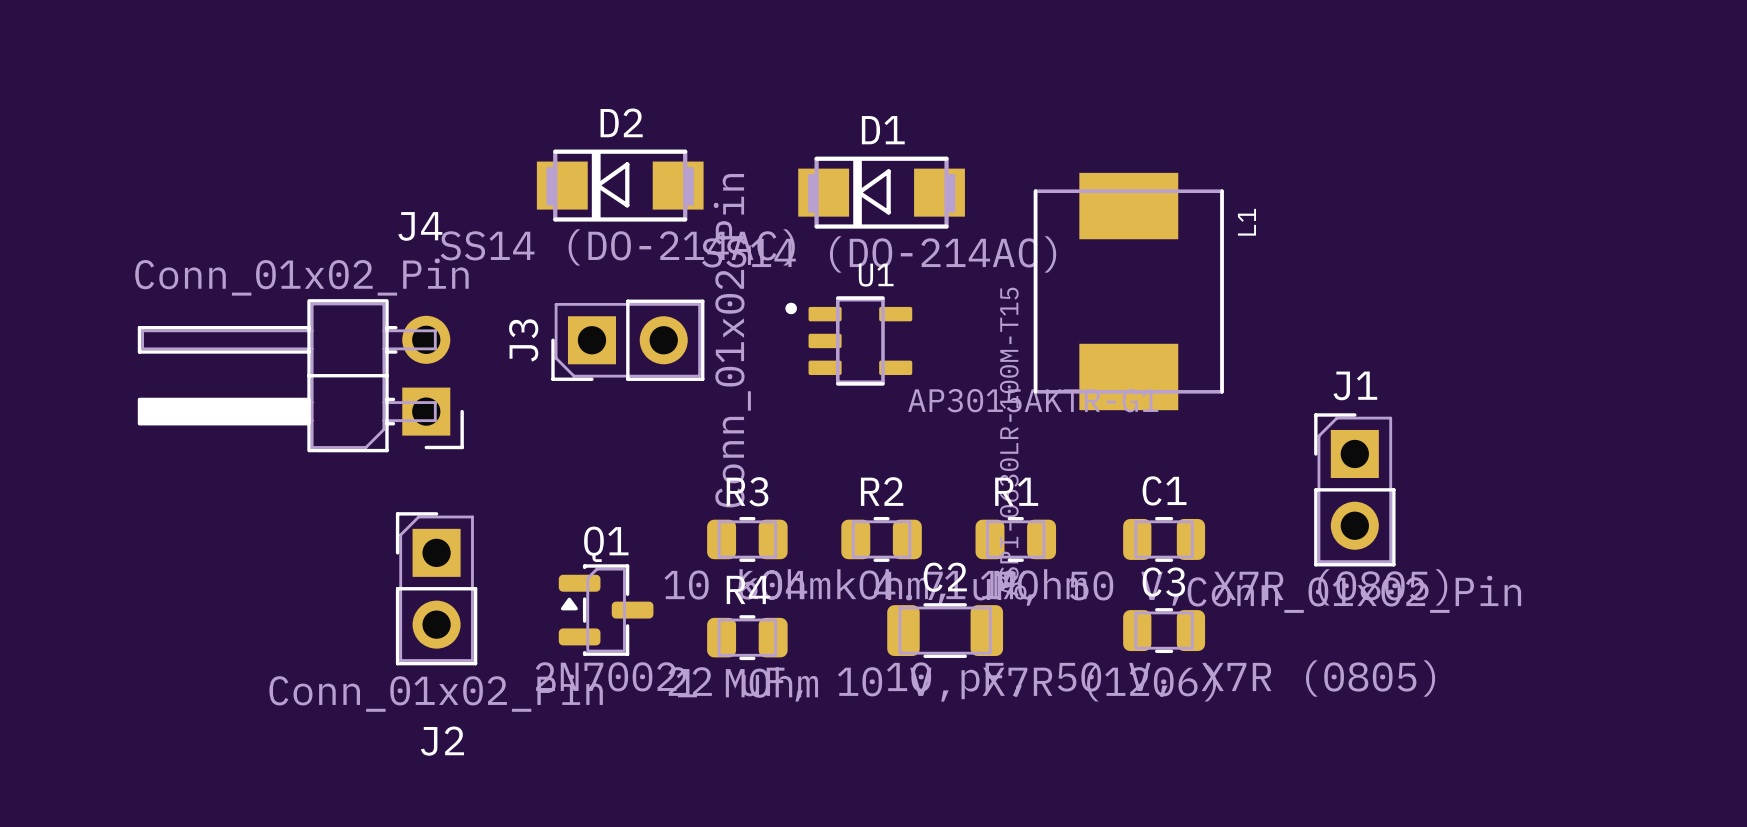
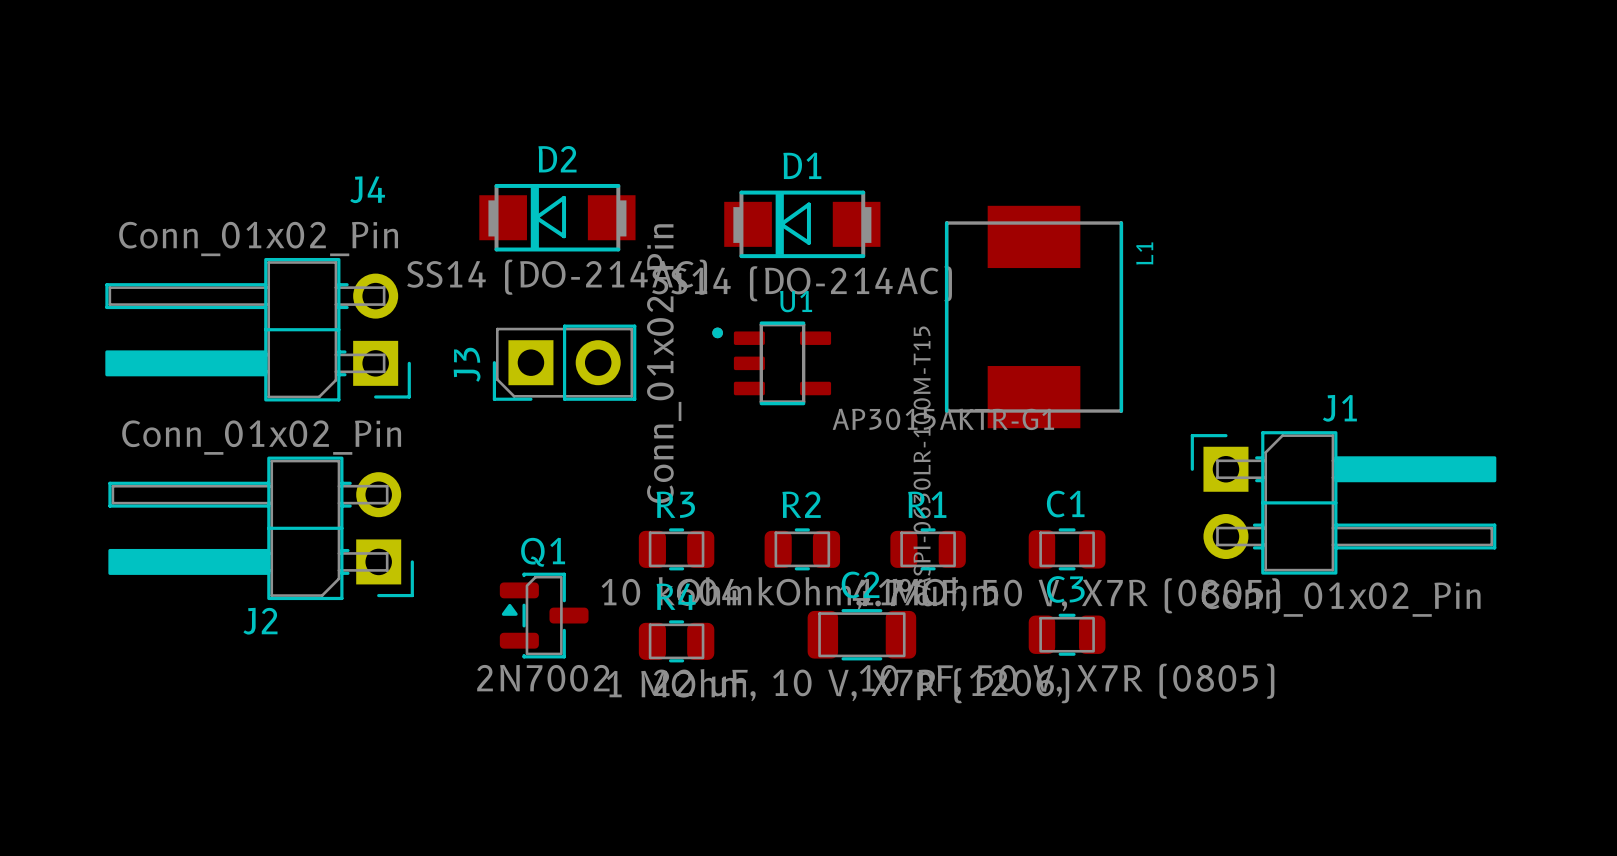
J4 position: (300, 375) -> (258, 329)
J1 footprint: [1314, 413, 1396, 567] -> [1190, 431, 1497, 575]
J2 footprint: [395, 512, 478, 666] -> [108, 456, 414, 601]
J2 value position: Conn_01x02_Pin (436, 693) -> Conn_01x02_Pin (261, 437)

